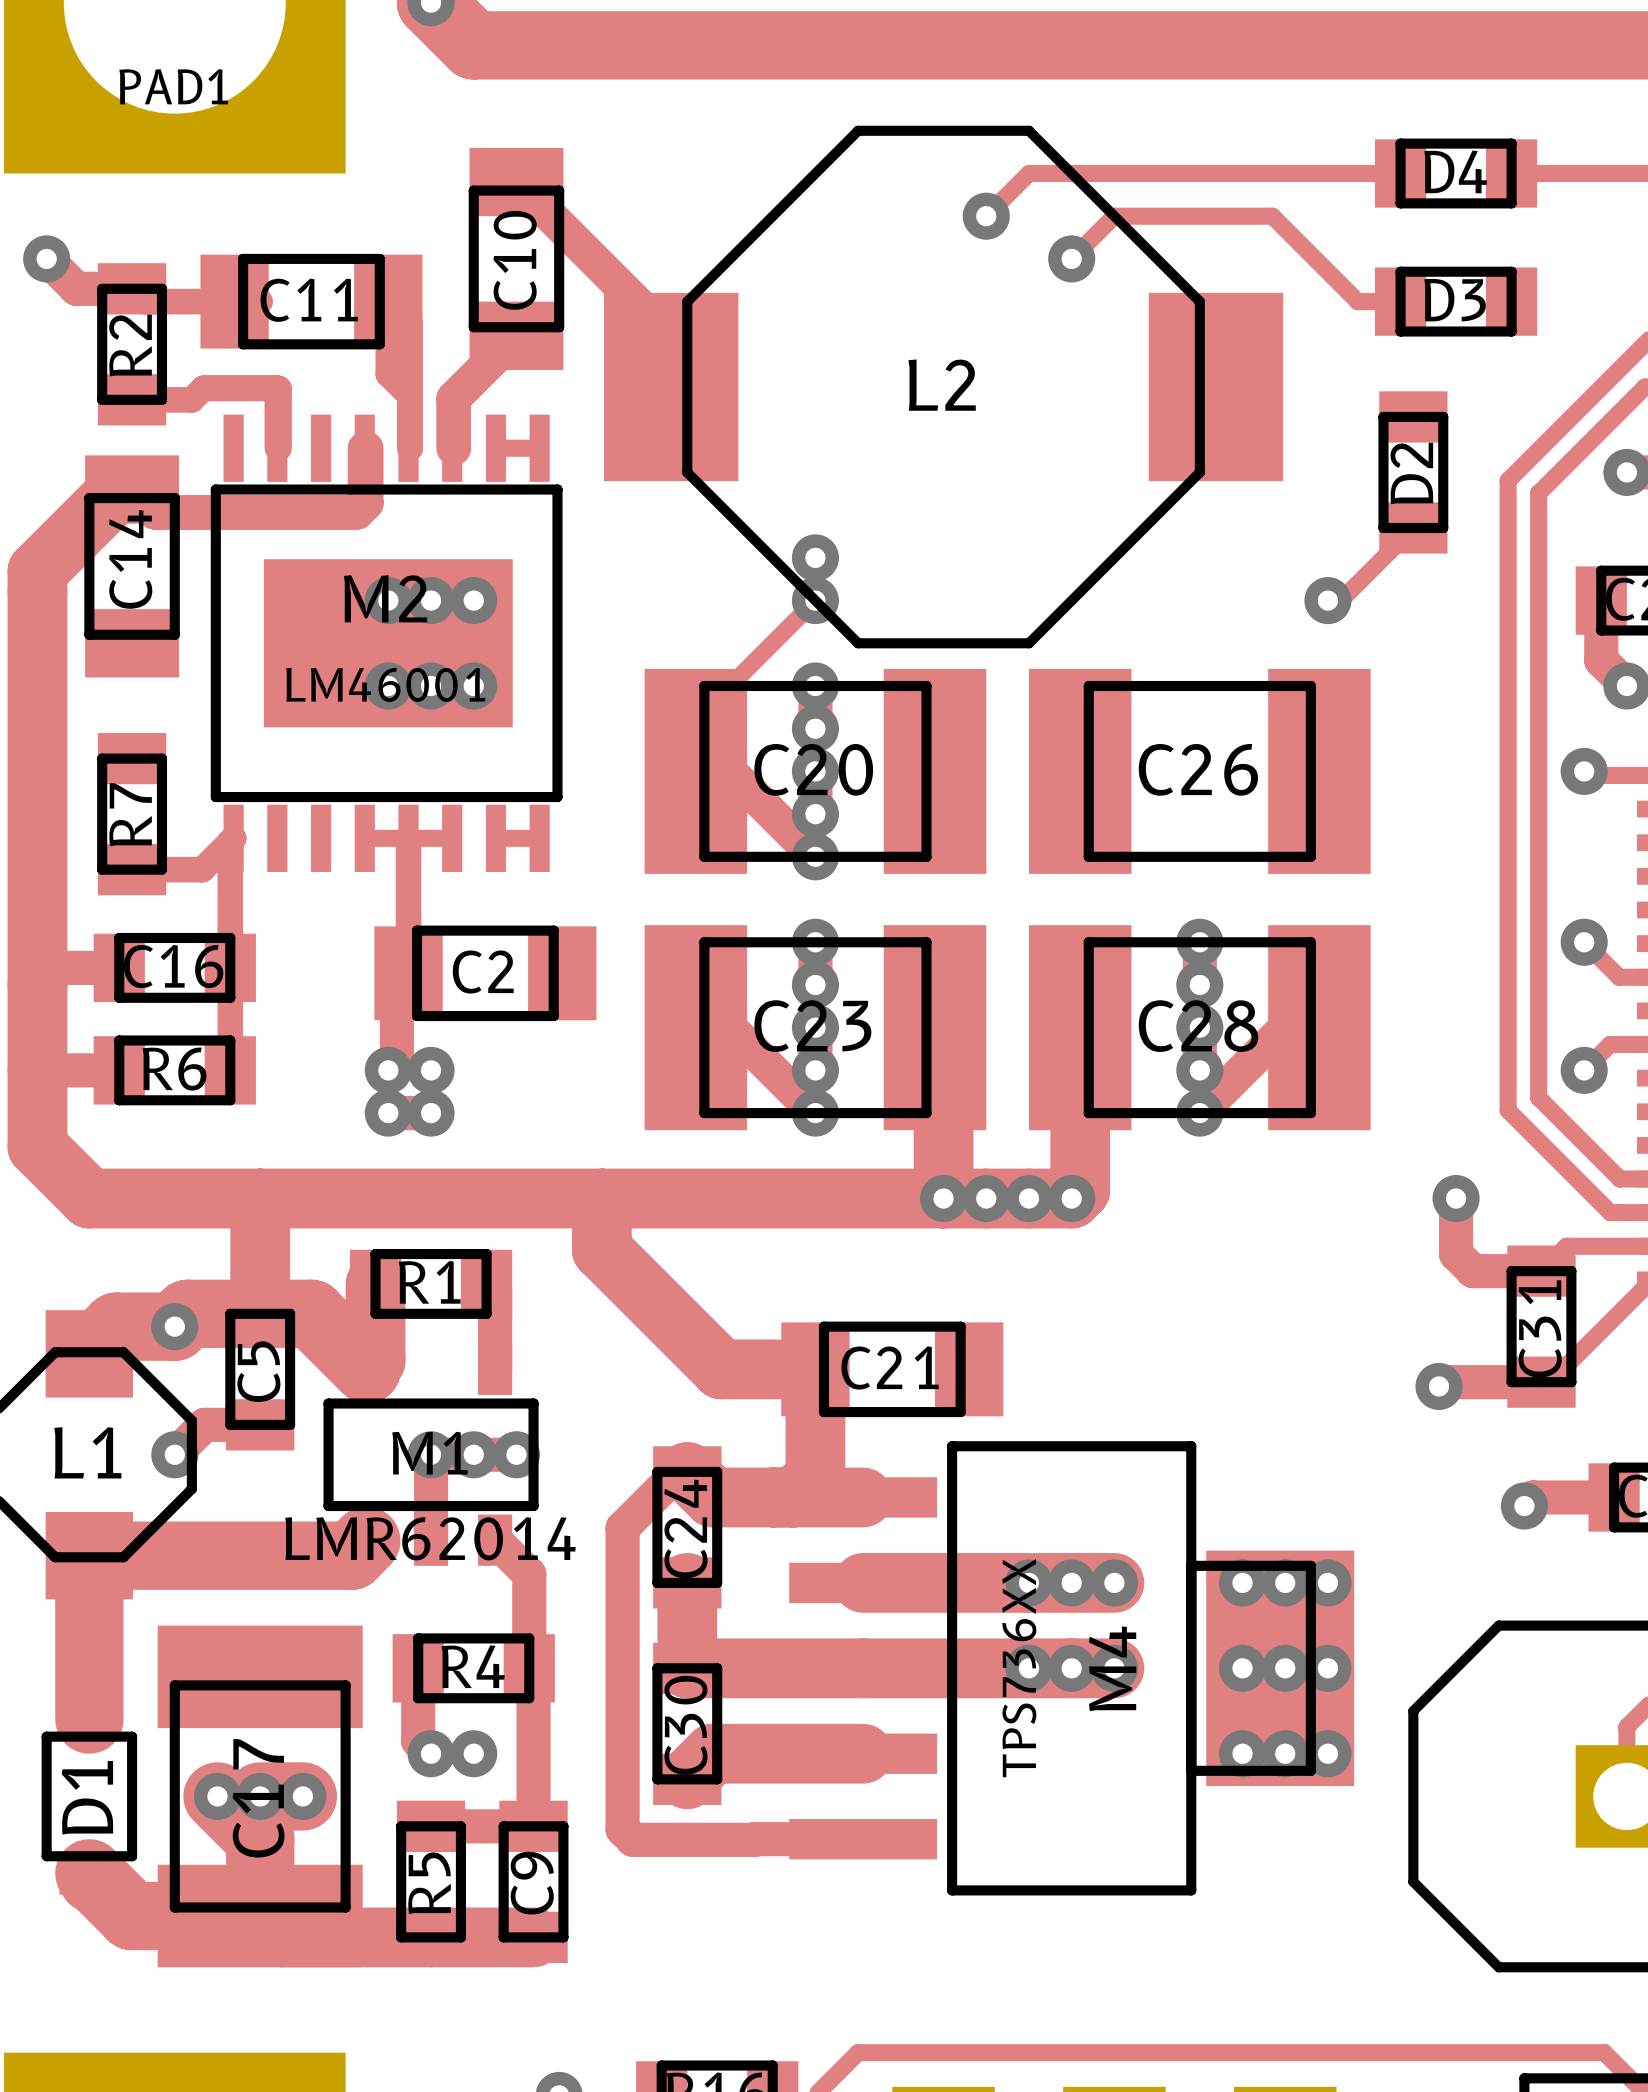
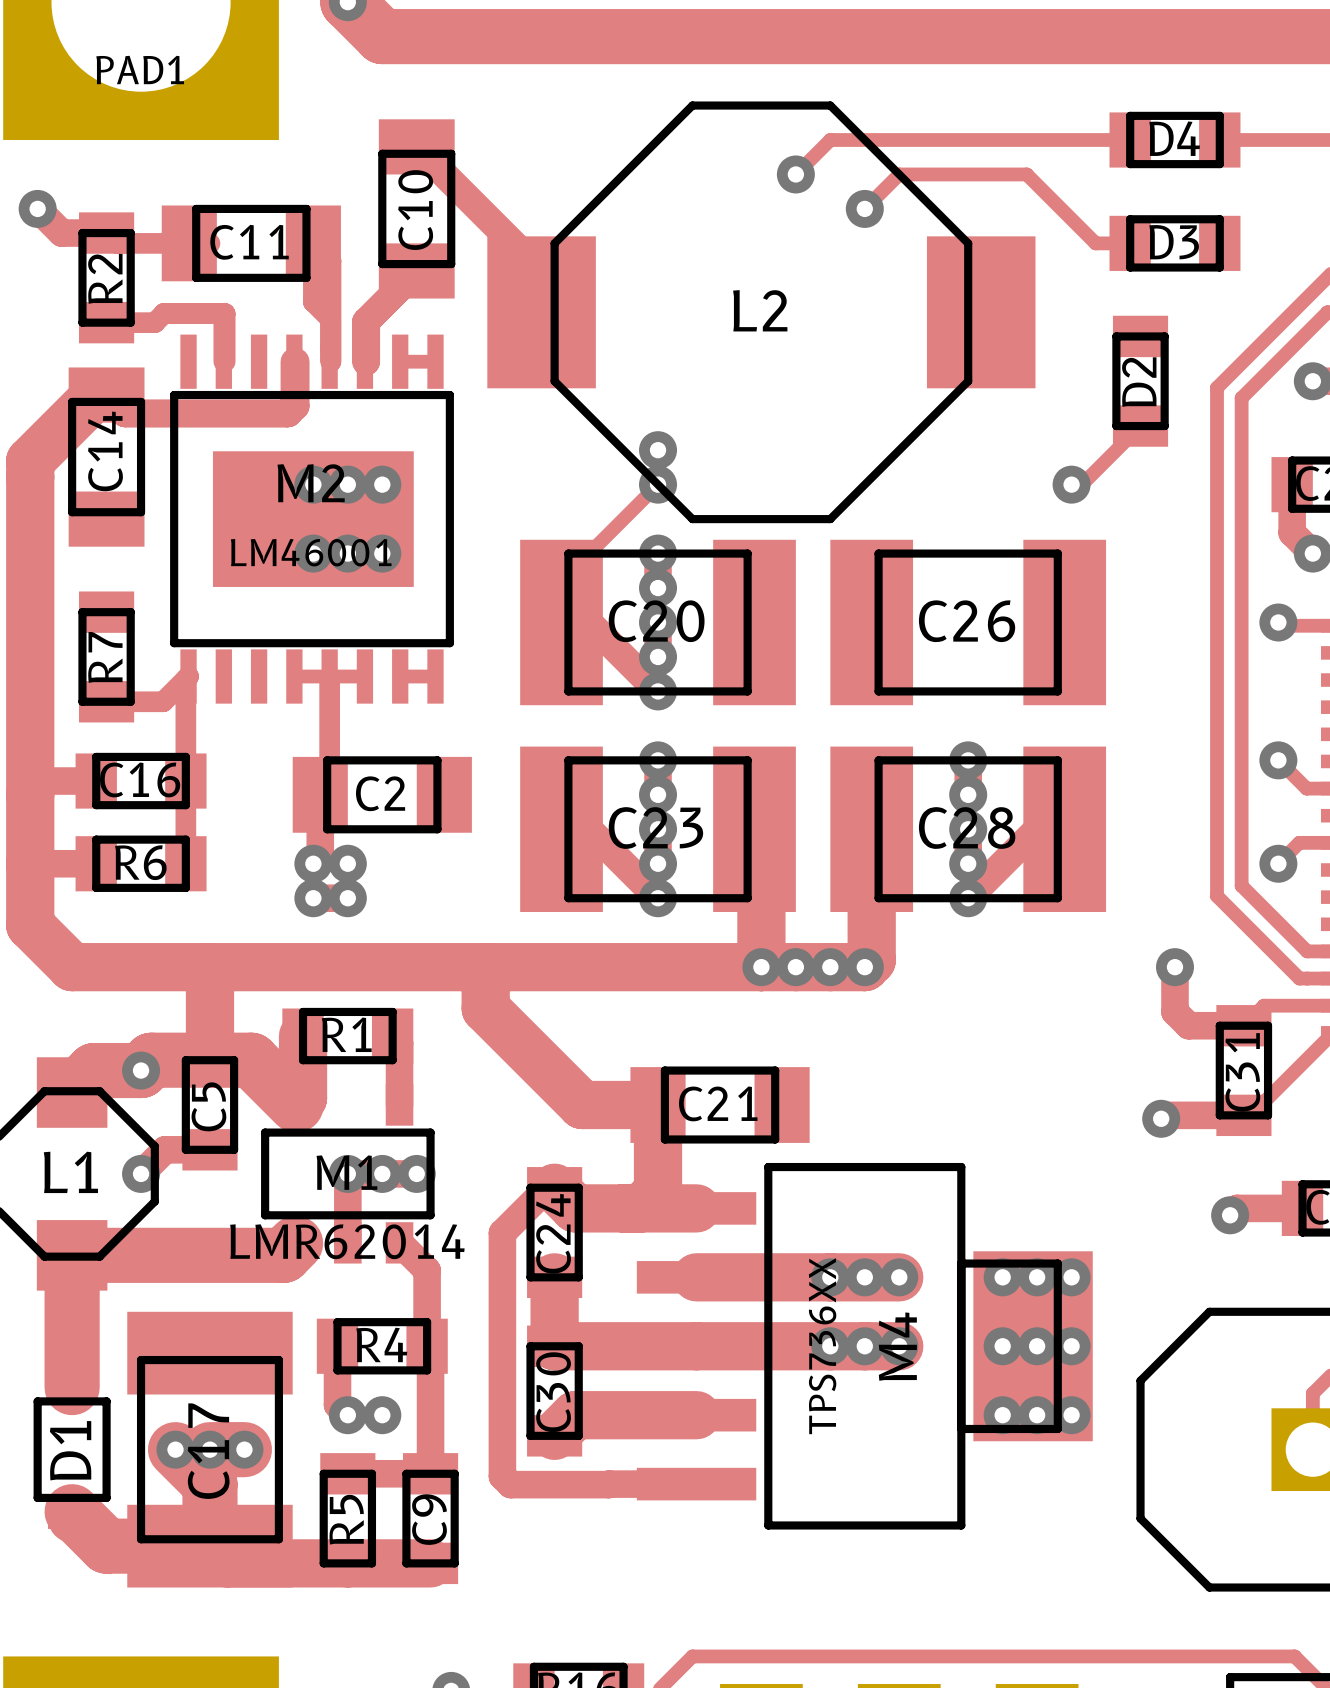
C2 position: (485, 973) -> (382, 794)

